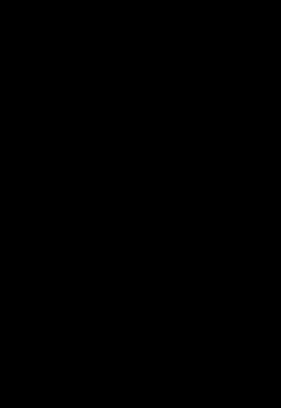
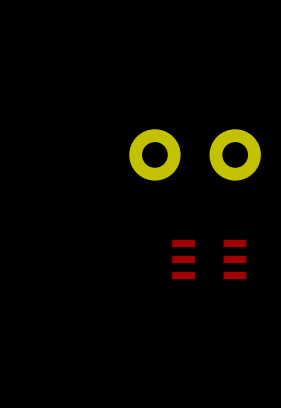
part: none -> (195, 154)
part: none -> (209, 259)

